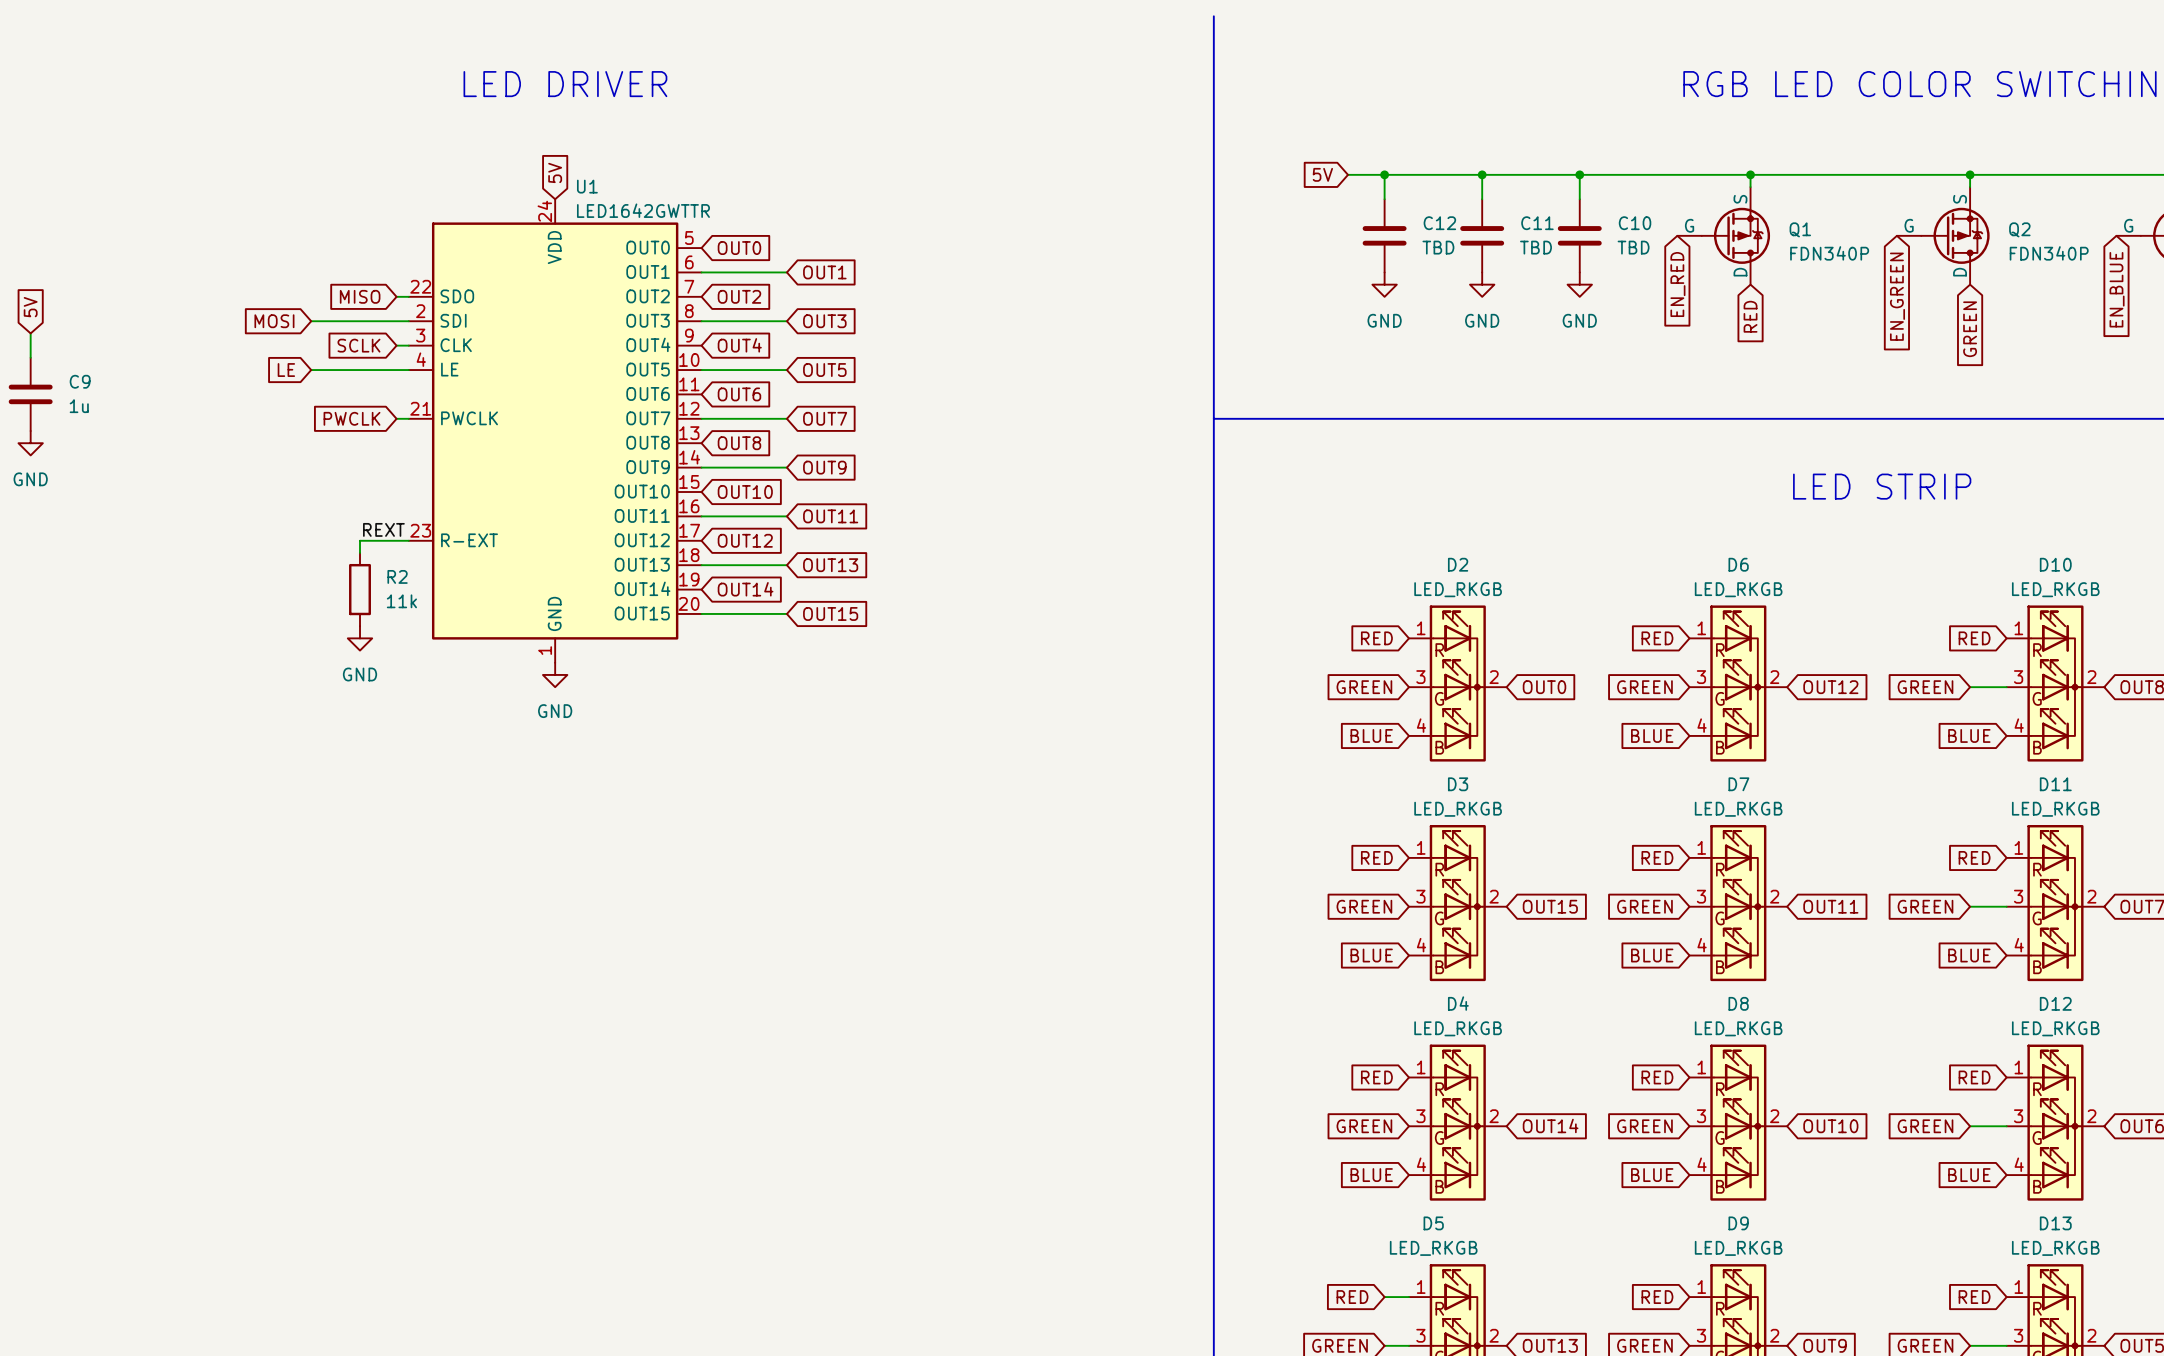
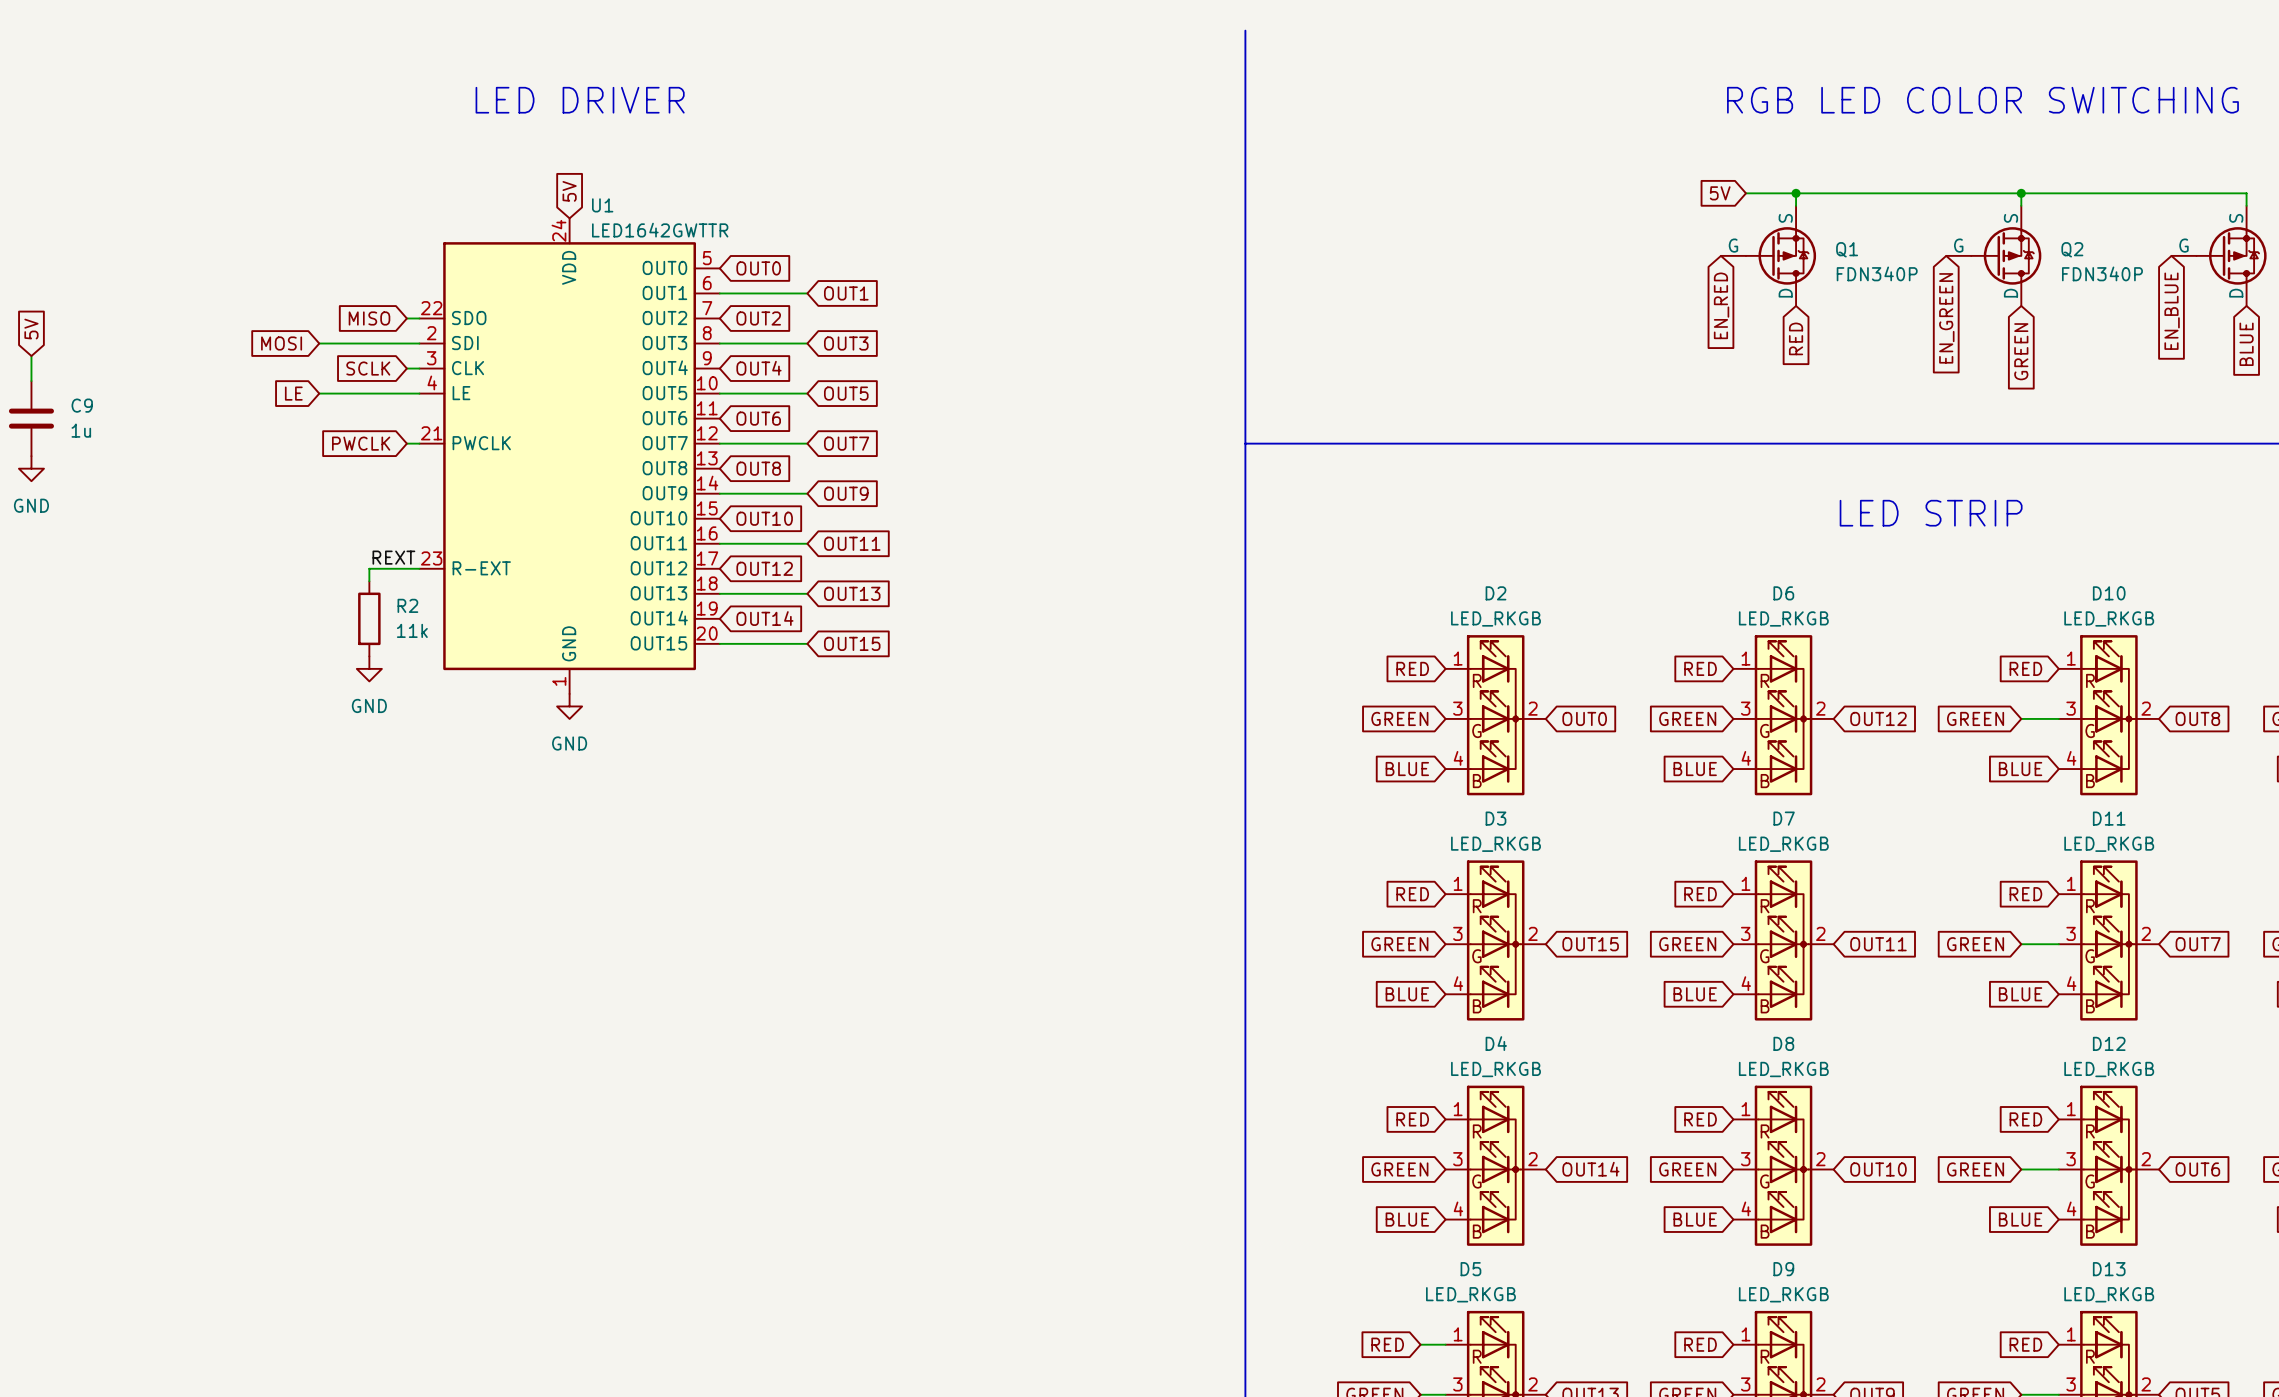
global label: 5V (1322, 174) -> none
wire: (1348, 174) (1701, 174) -> none
wire: (1384, 174) (1384, 199) -> none
junction: (1384, 174) -> none
wire: (1482, 174) (1482, 199) -> none
junction: (1482, 174) -> none
wire: (1579, 174) (1579, 199) -> none
junction: (1579, 174) -> none
global label: none -> 5V (1720, 193)
C12: TBD (1384, 235) -> none
C11: TBD (1482, 235) -> none
C10: TBD (1579, 235) -> none
power symbol: GND (1384, 284) -> none
power symbol: GND (1482, 284) -> none
power symbol: GND (1579, 284) -> none

